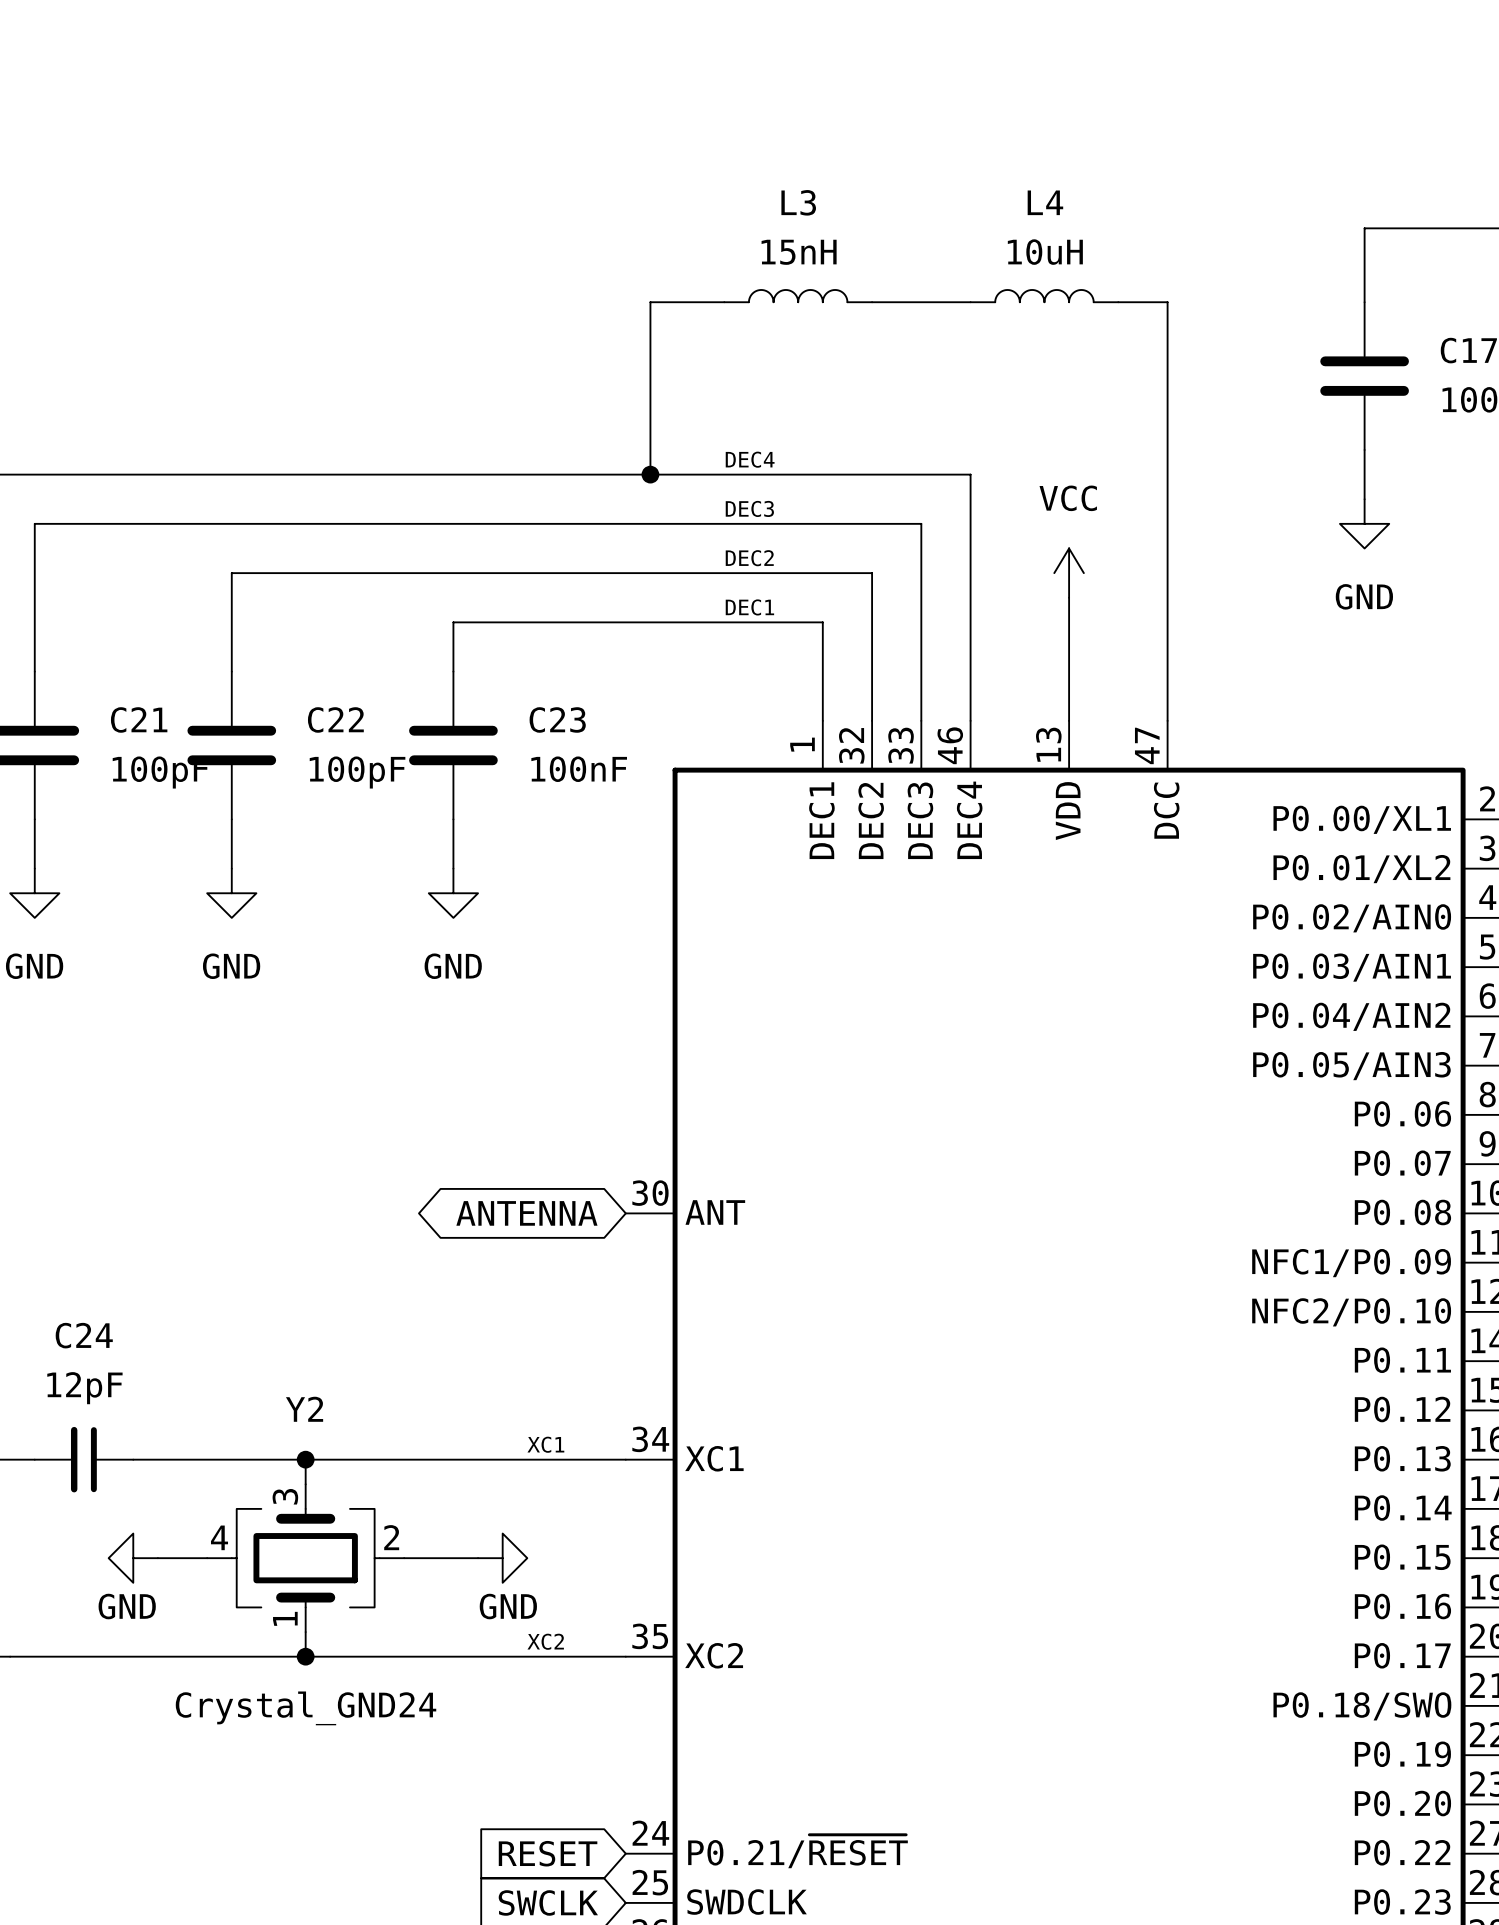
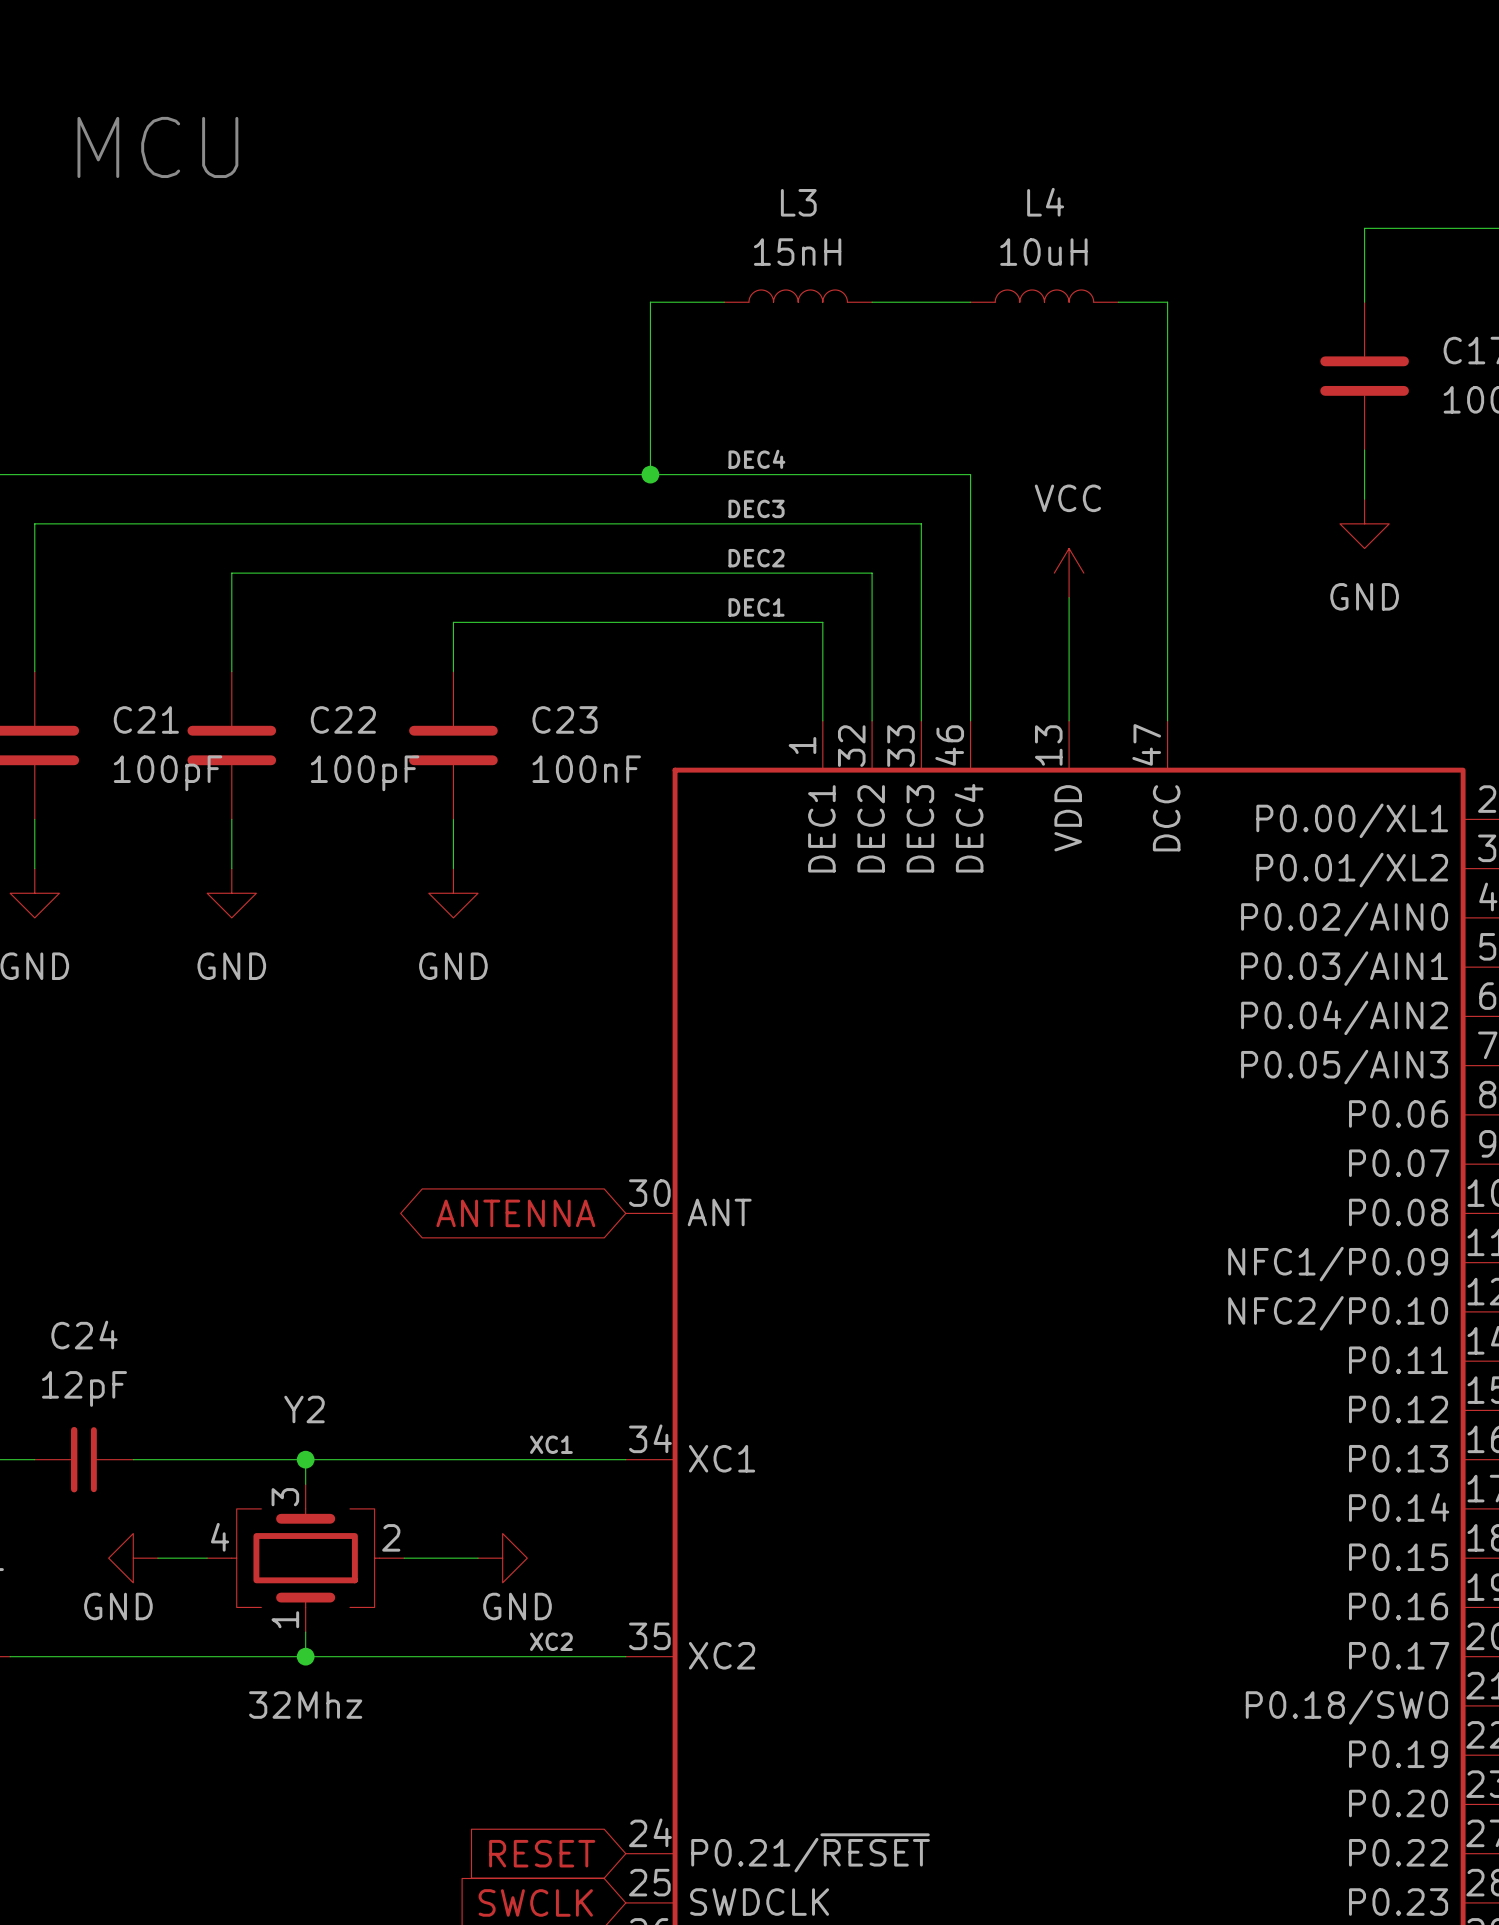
text: none -> MCU (157, 147)
Y2 value: Crystal_GND24 (306, 1708) -> 32Mhz (305, 1705)

